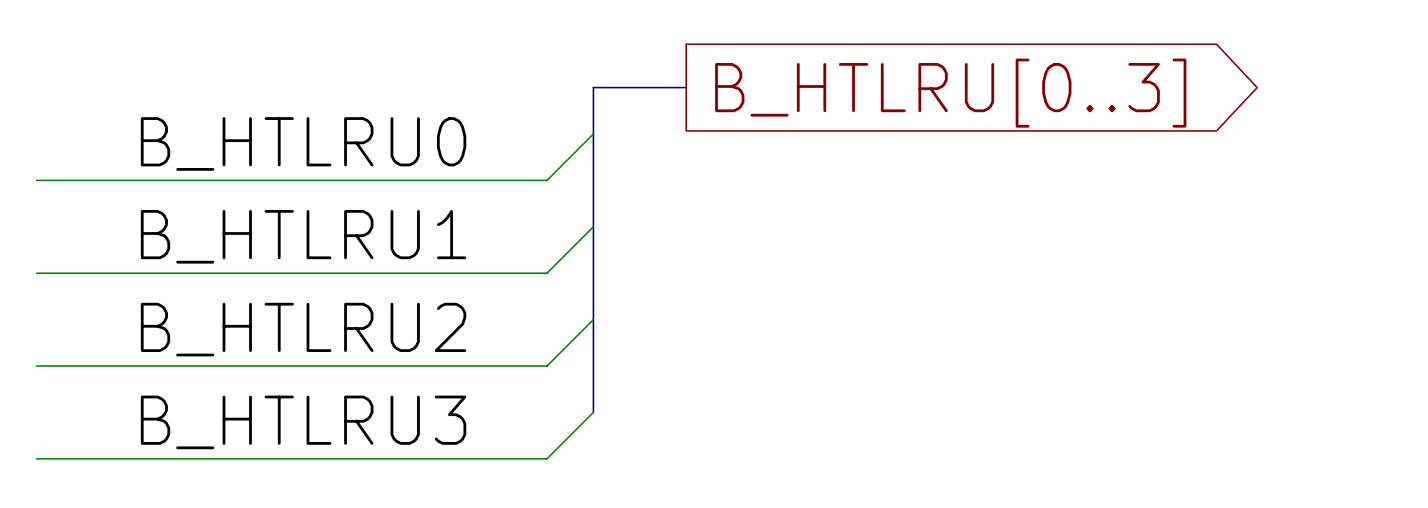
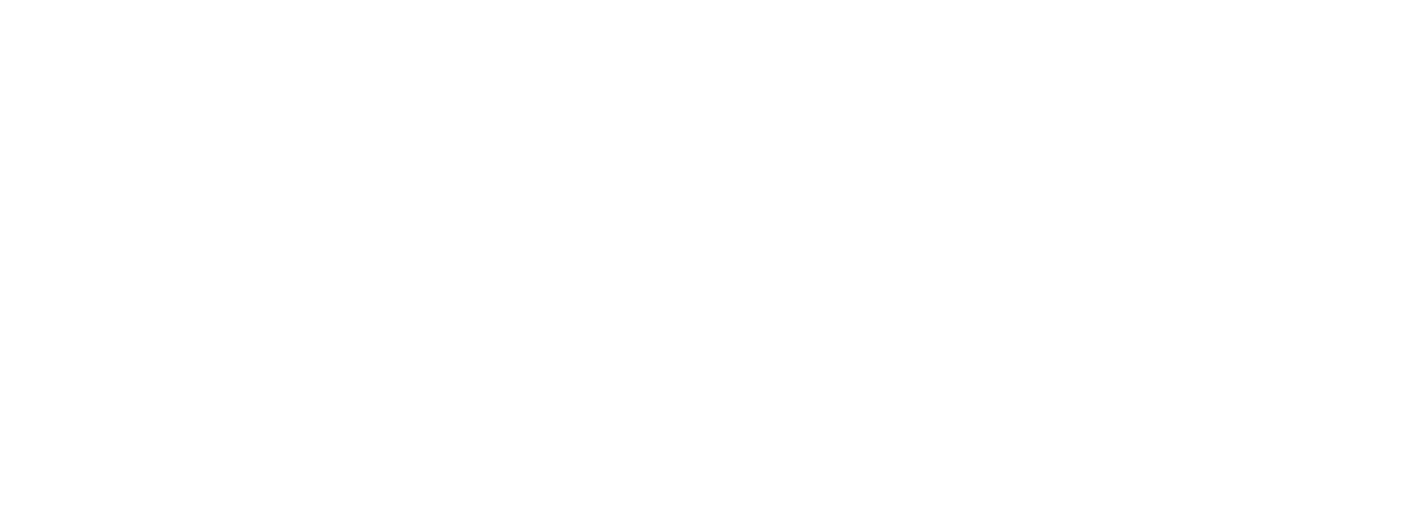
bus: (686, 87) (593, 87) (593, 412) -> none
global label: B_HTLRU[0..3] (950, 93) -> none
wire: (593, 133) (547, 180) (36, 180) -> none
label: B_HTLRU0 (303, 143) -> none
wire: (593, 226) (547, 273) (36, 273) -> none
label: B_HTLRU1 (303, 236) -> none
wire: (593, 319) (547, 366) (36, 366) -> none
label: B_HTLRU2 (303, 329) -> none
wire: (593, 412) (547, 458) (36, 458) -> none
label: B_HTLRU3 (303, 422) -> none

